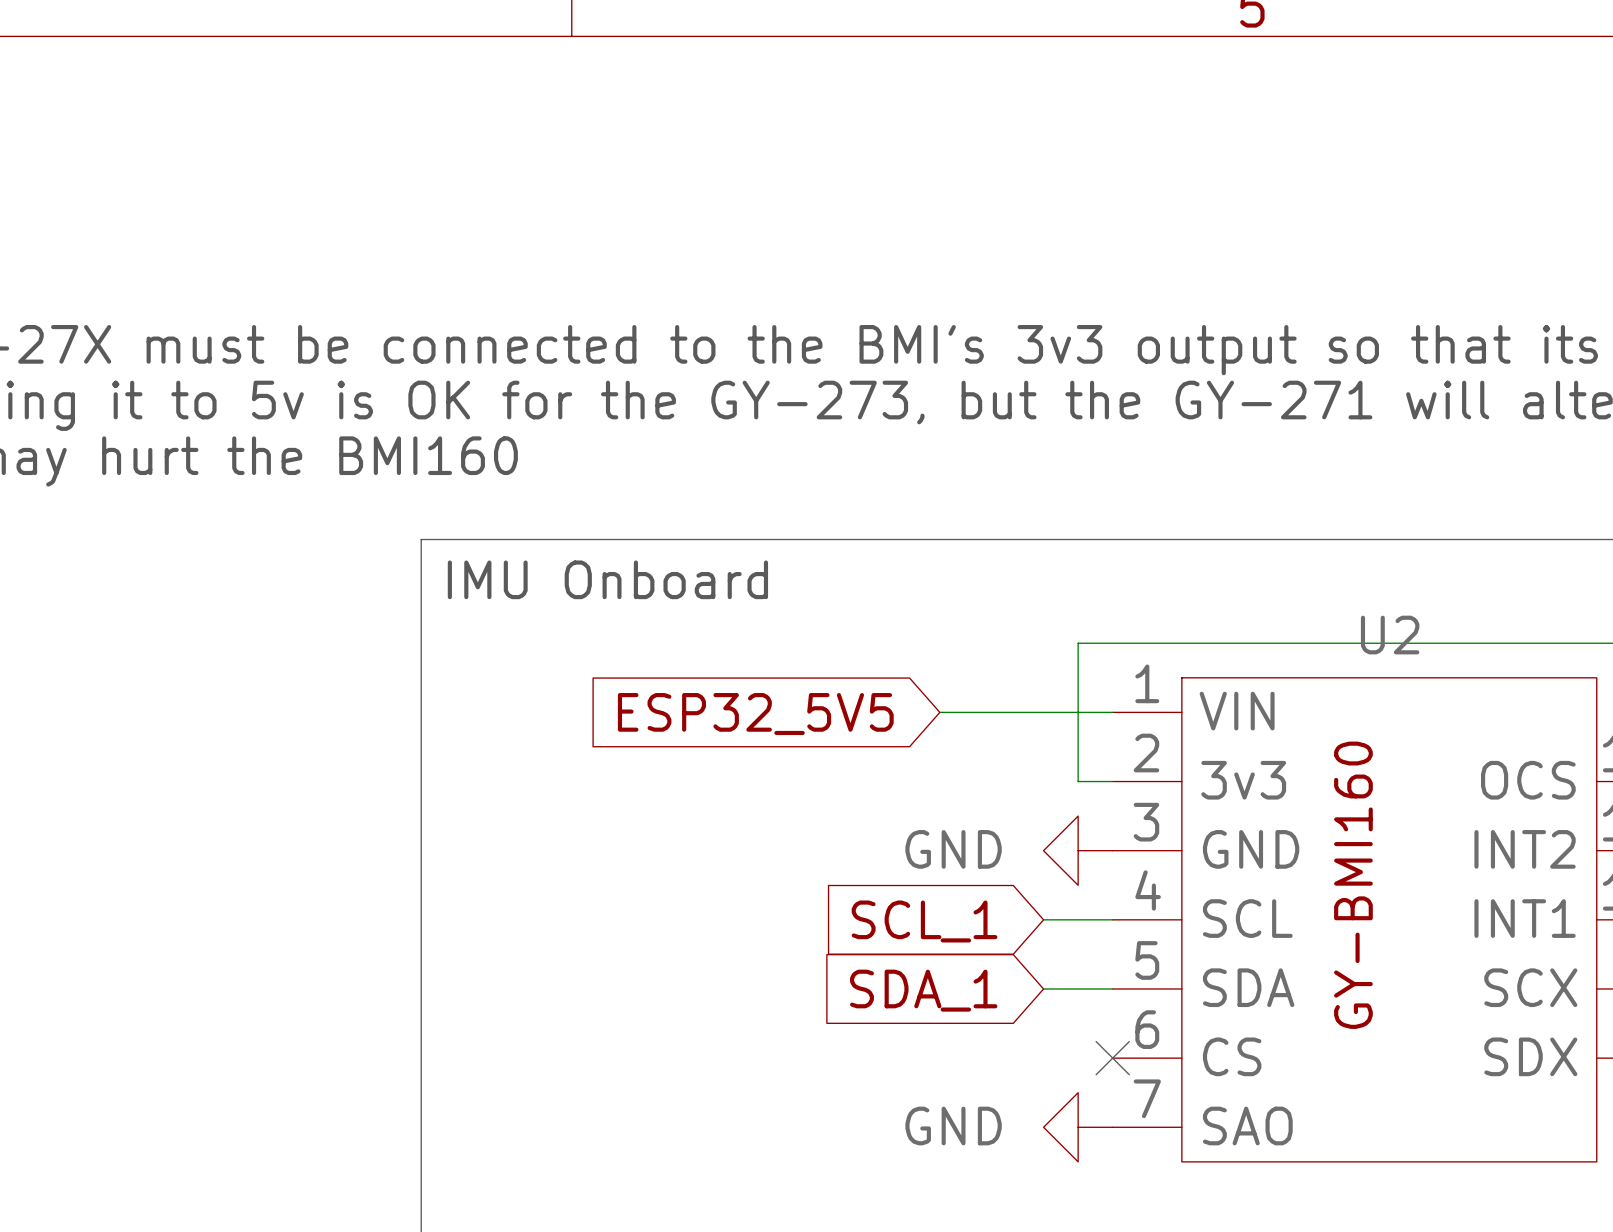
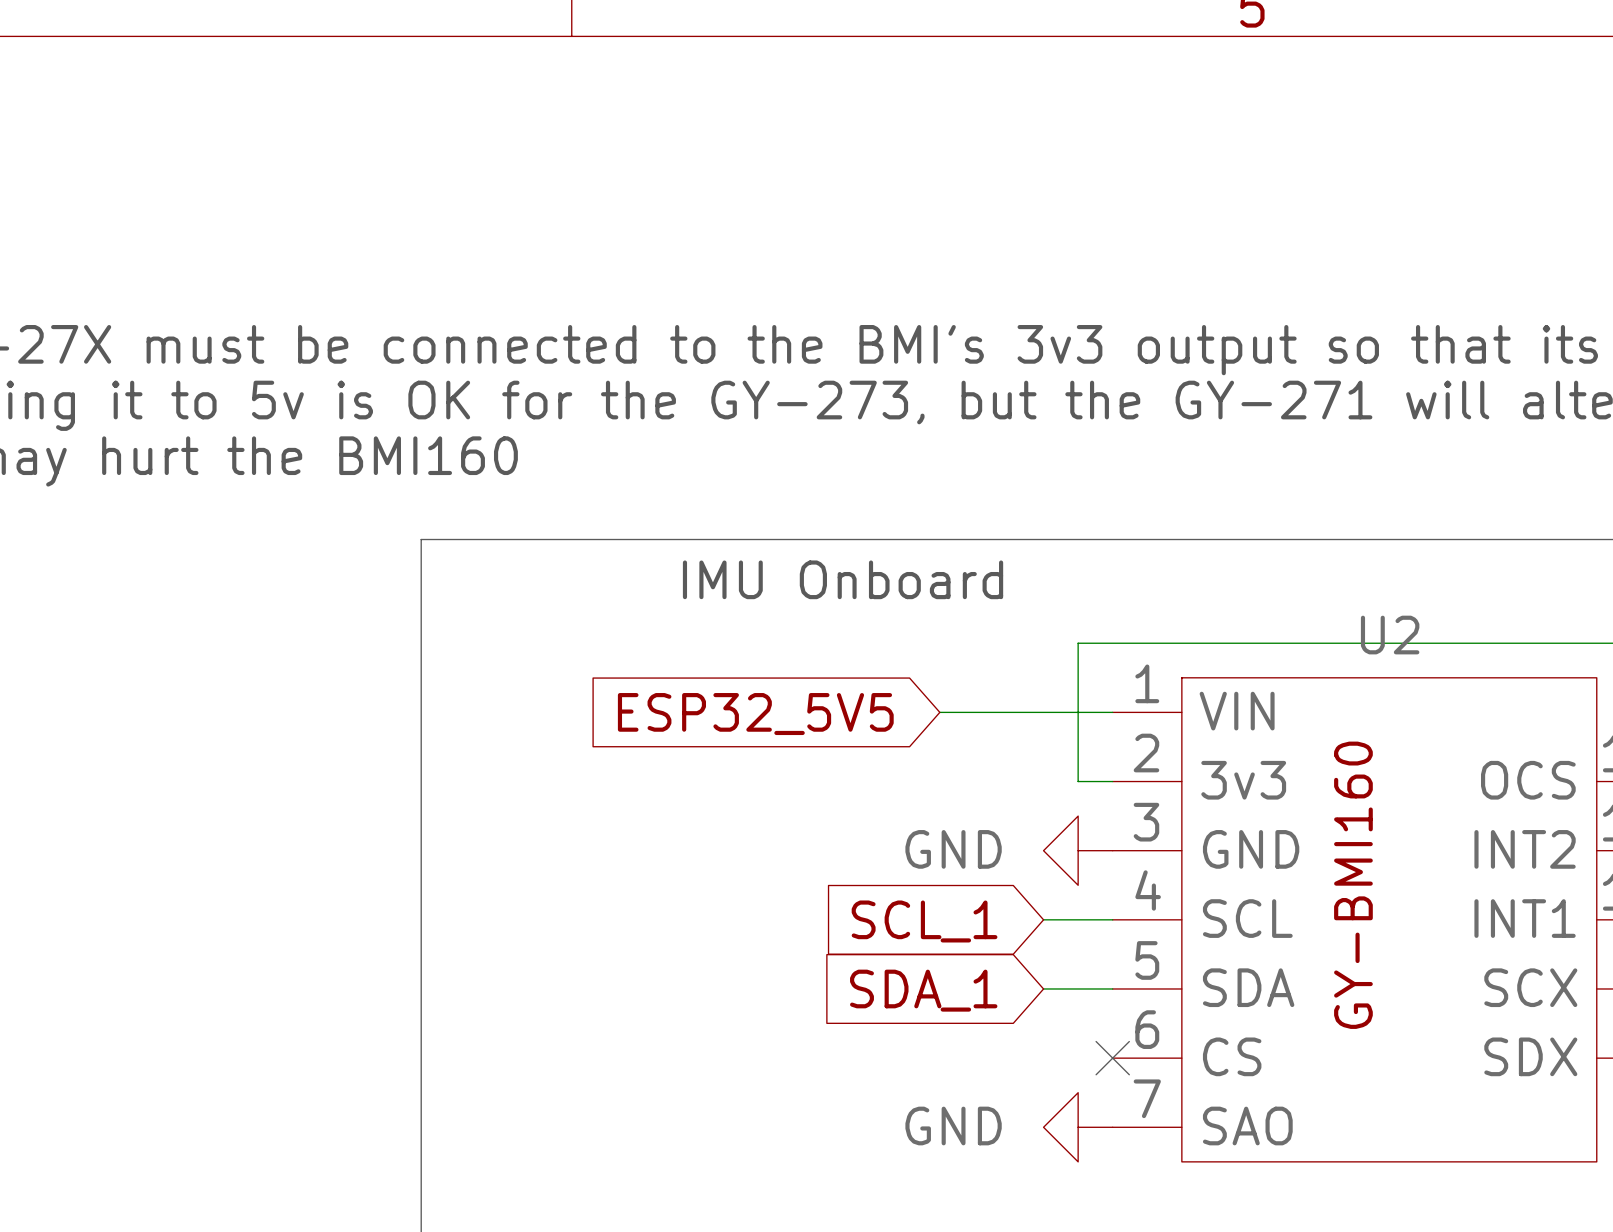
text position: IMU Onboard (607, 579) -> IMU Onboard (843, 579)

